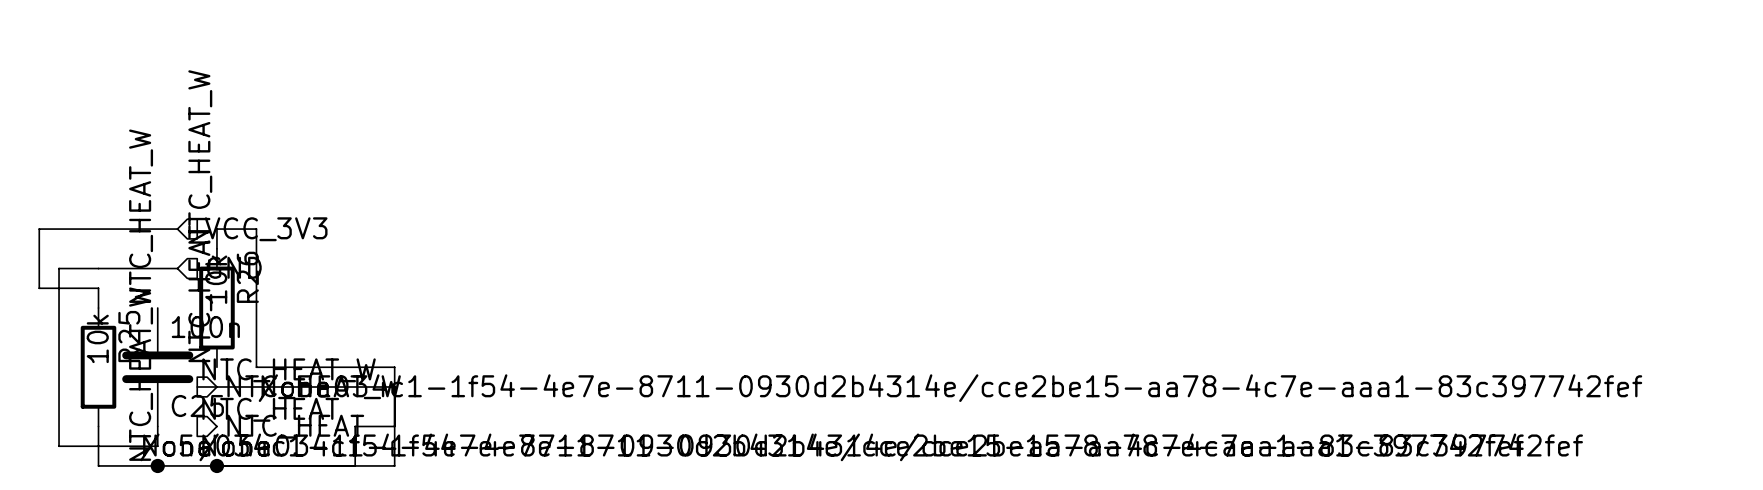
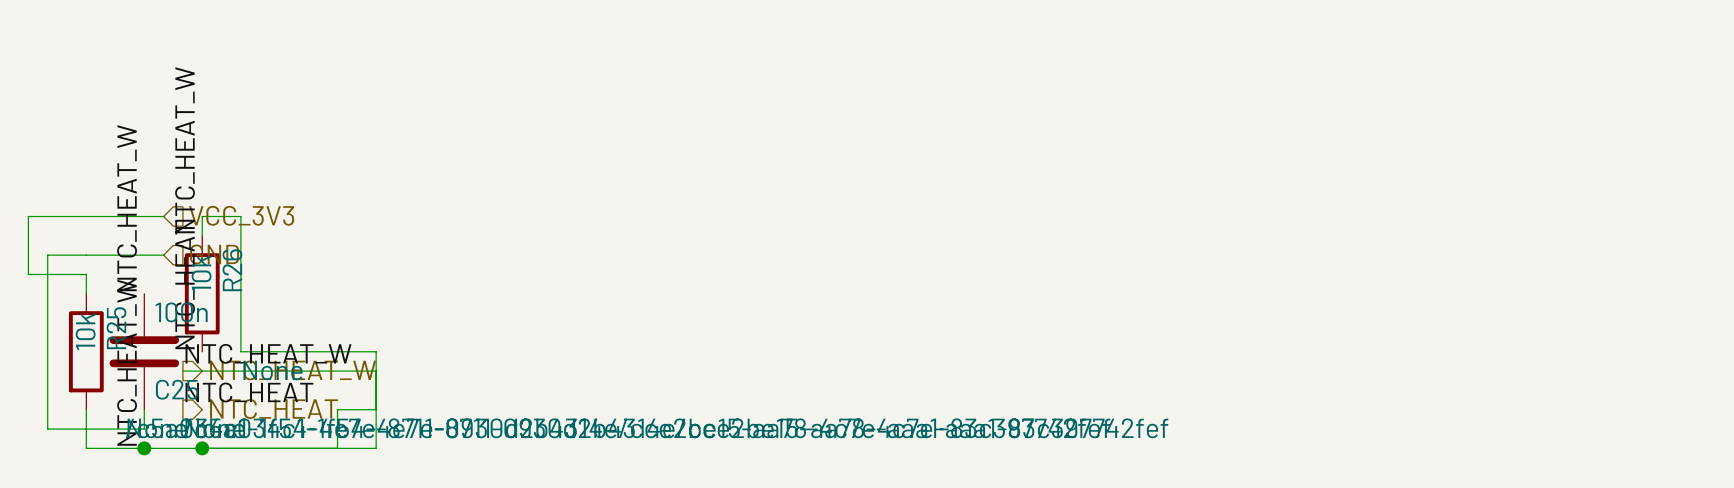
R26 text: /c5a034c1-1f54-4e7e-8711-0930d2b4314e/cce2be15-aa78-4c7e-aaa1-83c397742fef (950, 388) -> none

